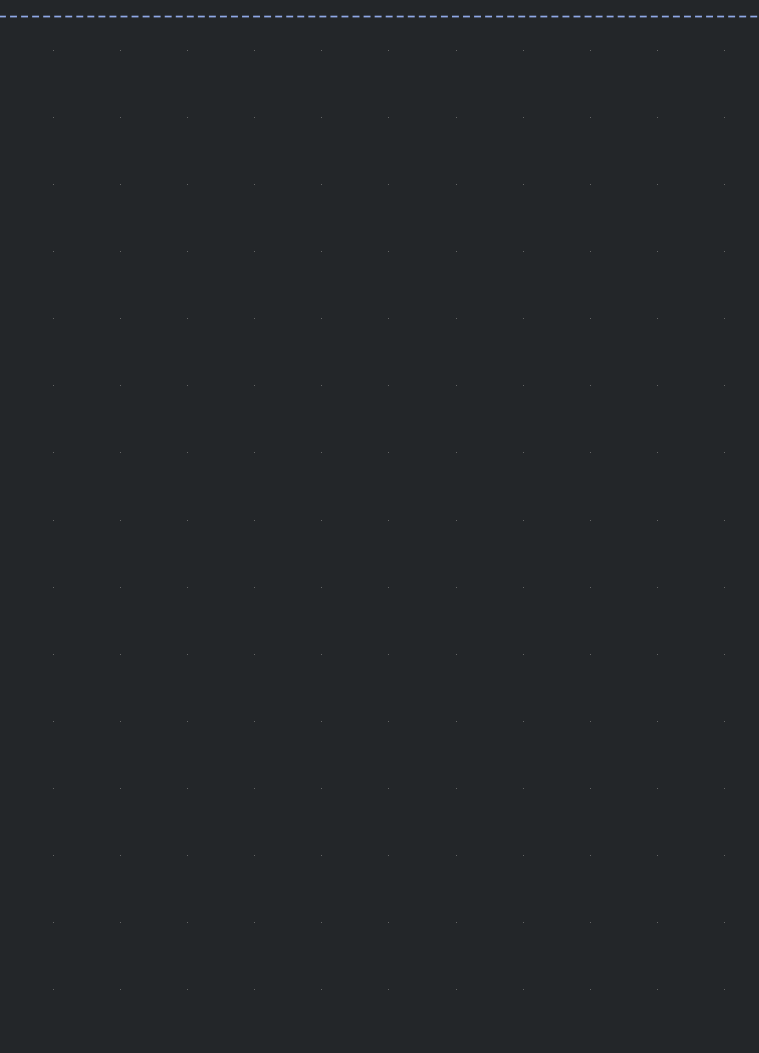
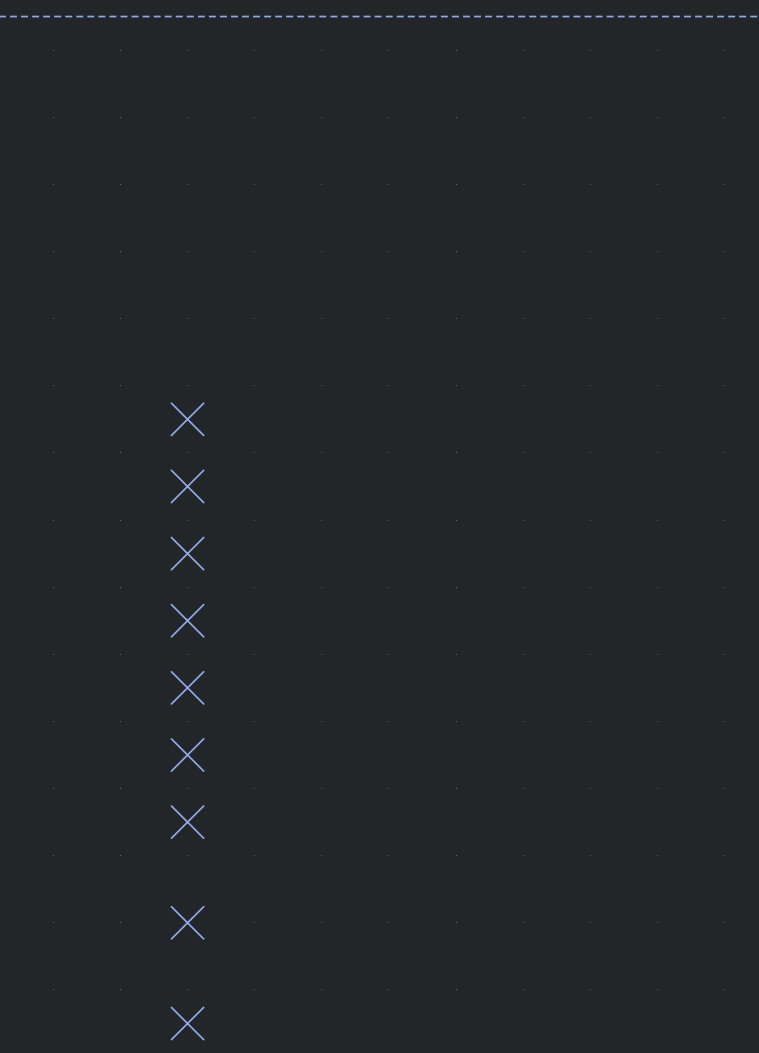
no-connect mark: none -> (187, 419)
no-connect mark: none -> (187, 486)
no-connect mark: none -> (187, 553)
no-connect mark: none -> (187, 620)
no-connect mark: none -> (187, 687)
no-connect mark: none -> (187, 754)
no-connect mark: none -> (187, 822)
no-connect mark: none -> (187, 922)
no-connect mark: none -> (187, 1023)

